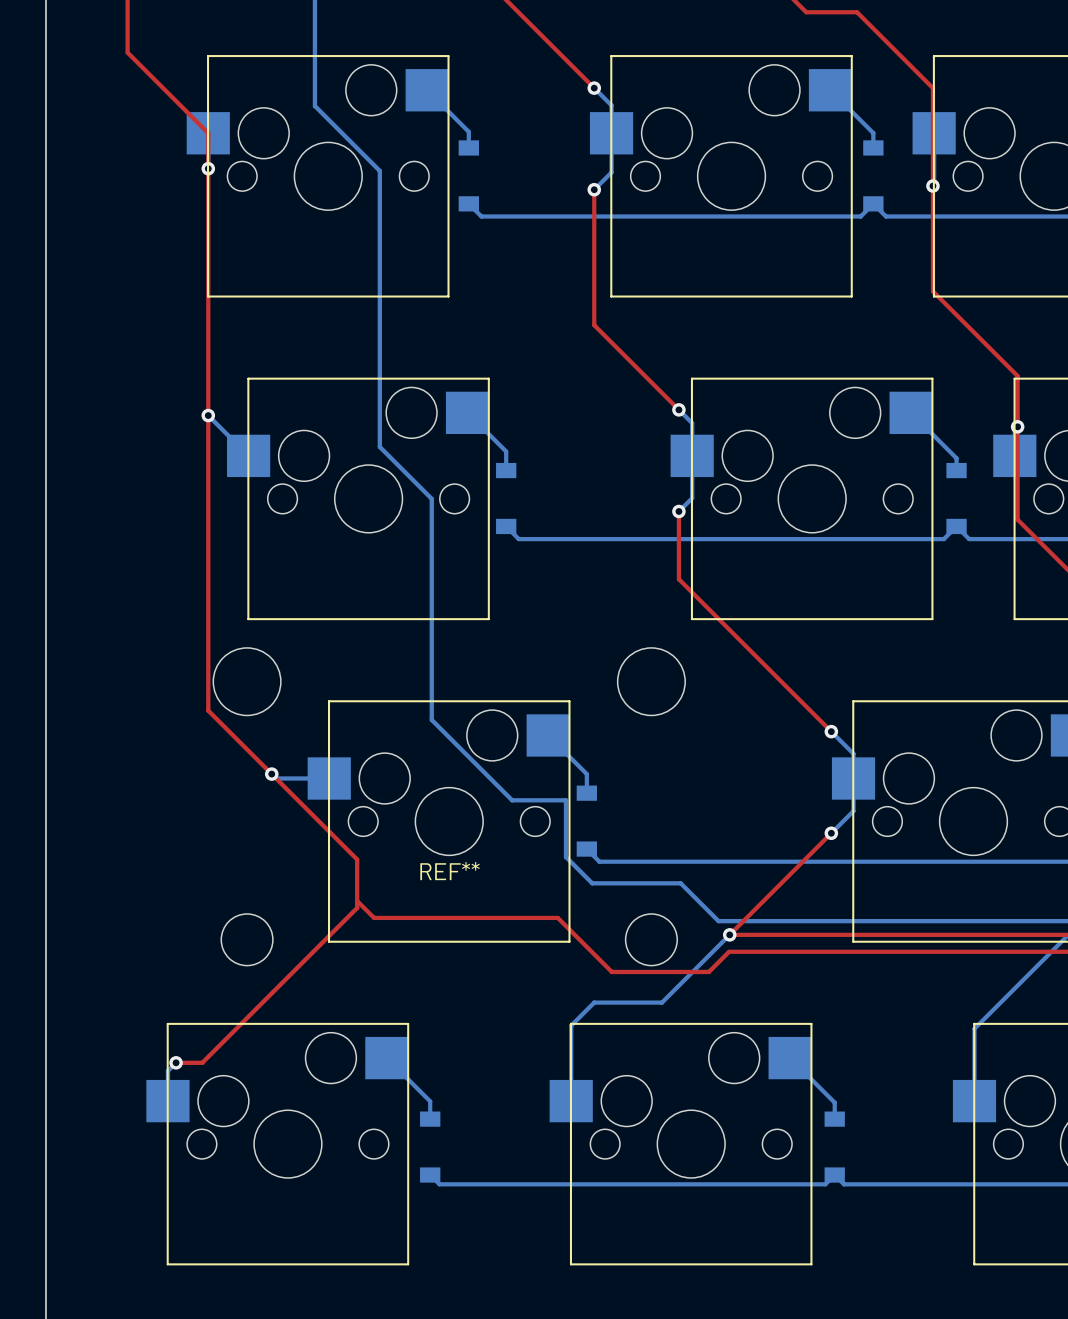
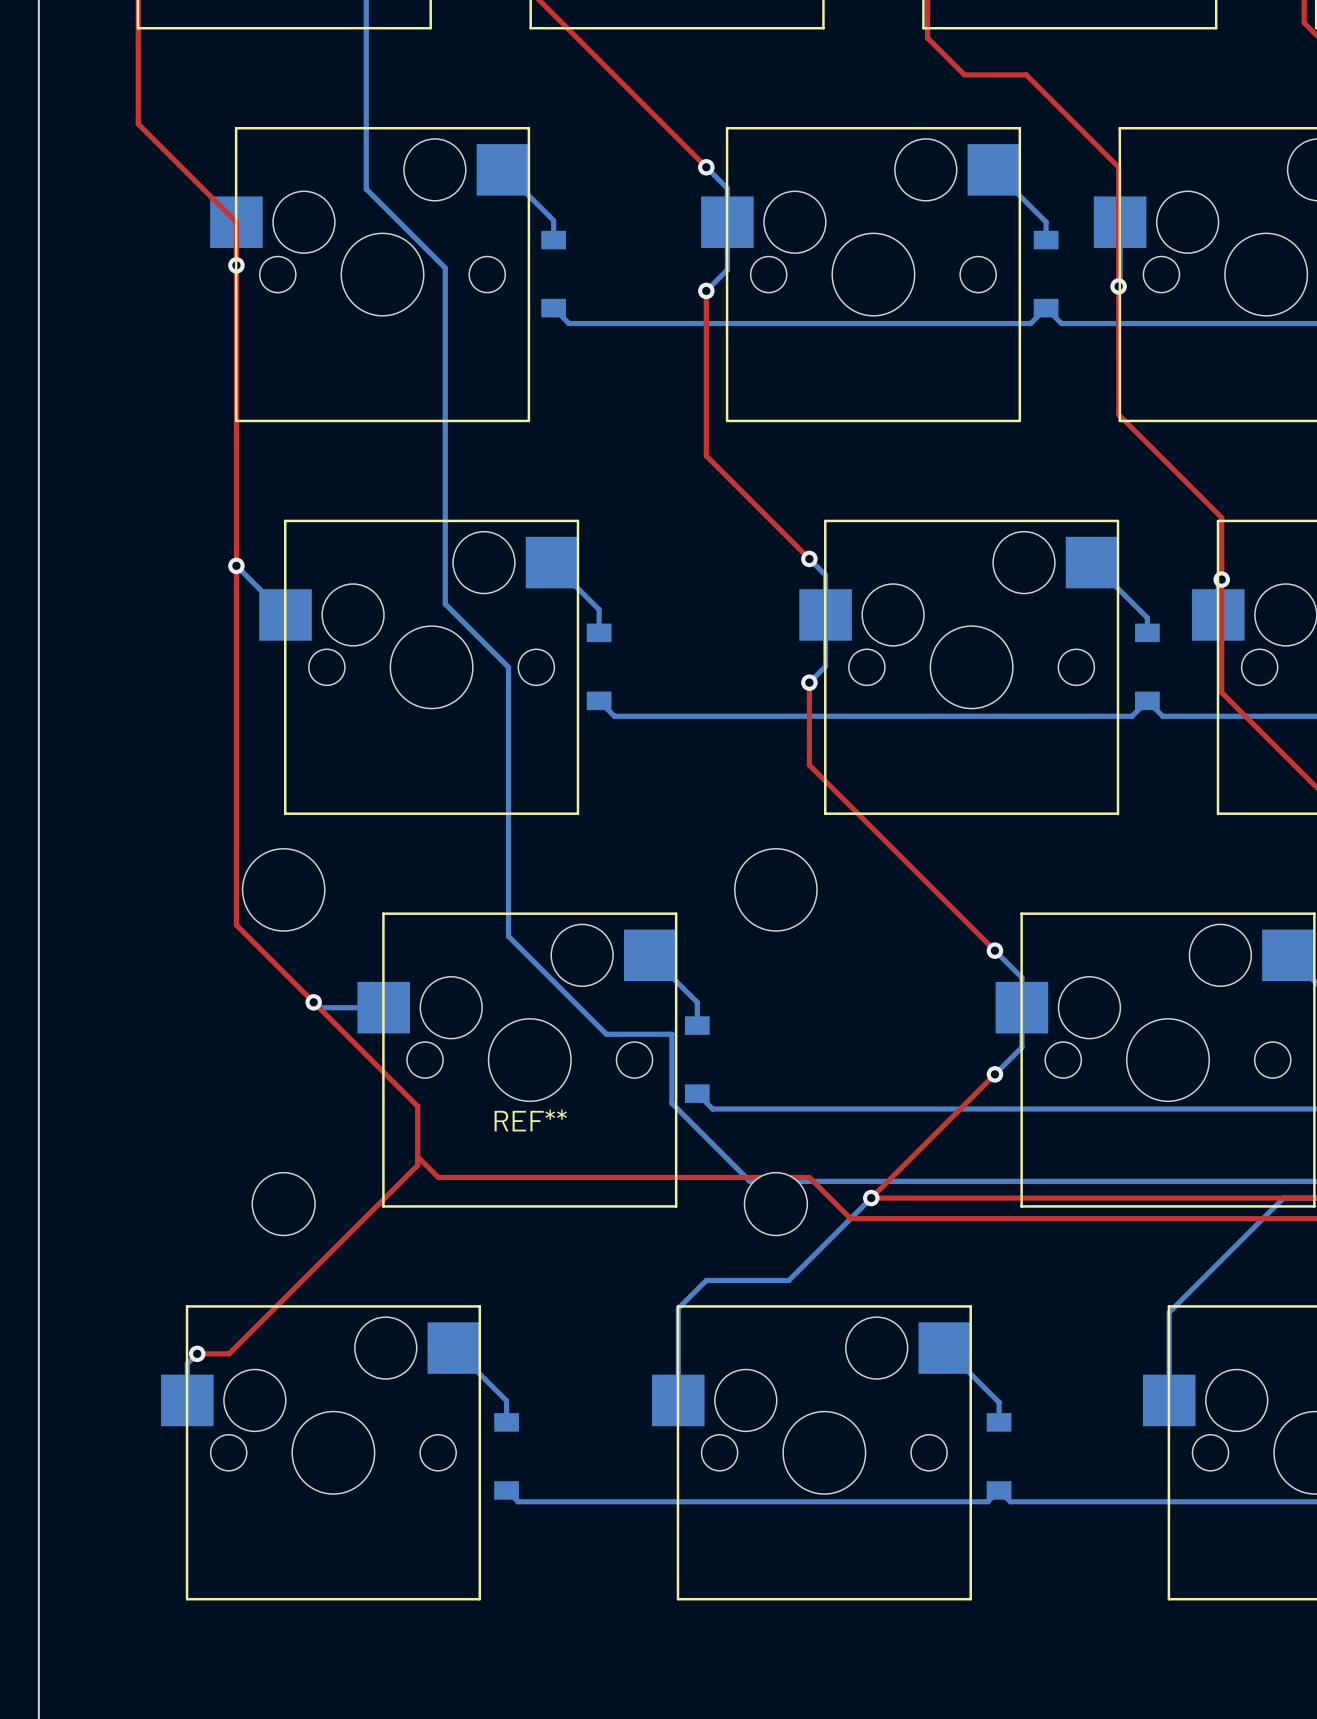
bottom track: (592, 883) (680, 883) (718, 921) -> (703, 1135) (749, 1181) (857, 1181)
top track: (557, 917) (611, 971) (708, 971) (729, 951) -> (661, 1177) (809, 1177) (850, 1218) (870, 1218)

